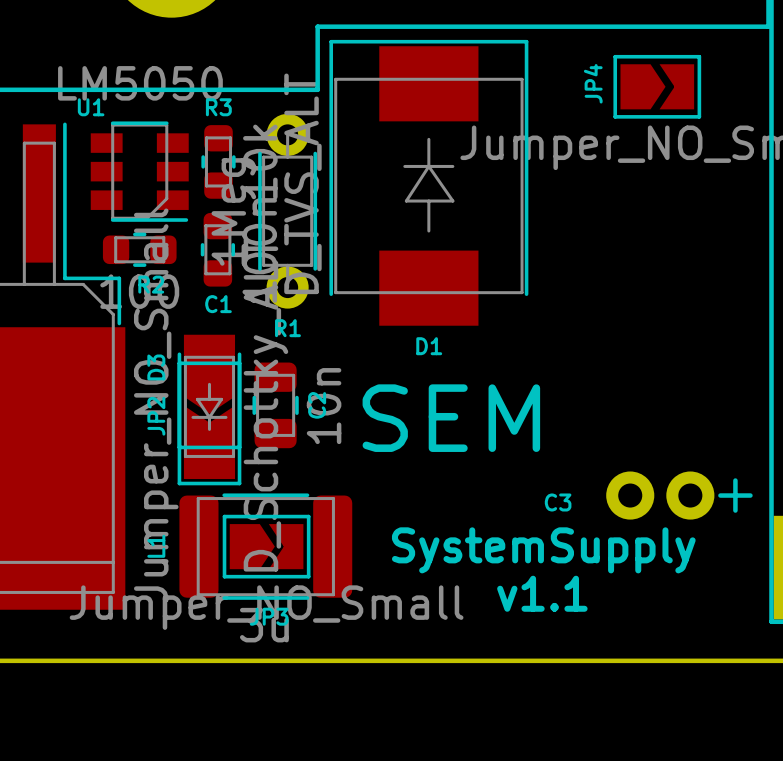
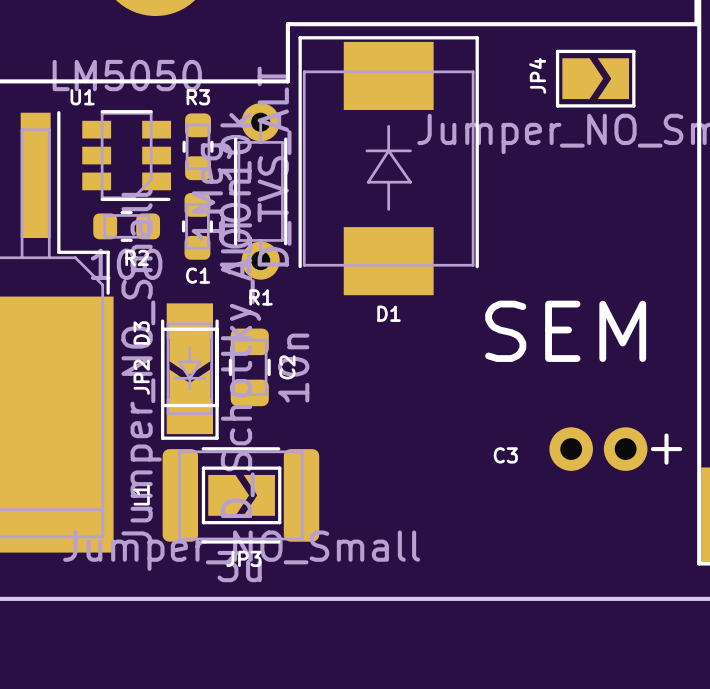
text position: SEM (451, 418) -> SEM (565, 331)
text: SystemSupply (543, 550) -> none
text: v1.1 (542, 593) -> none

